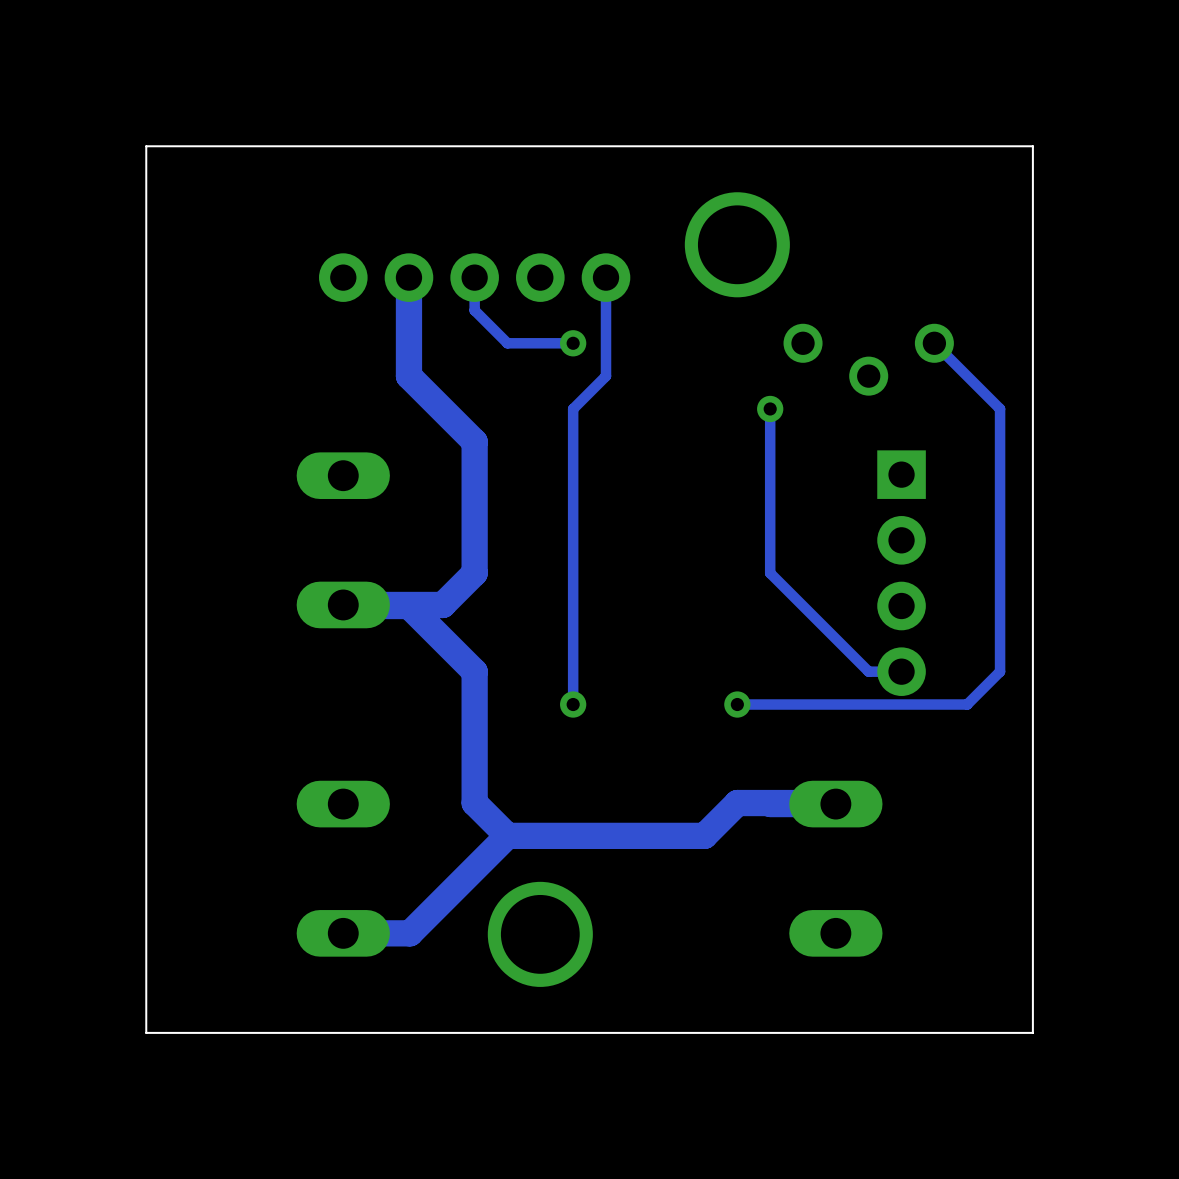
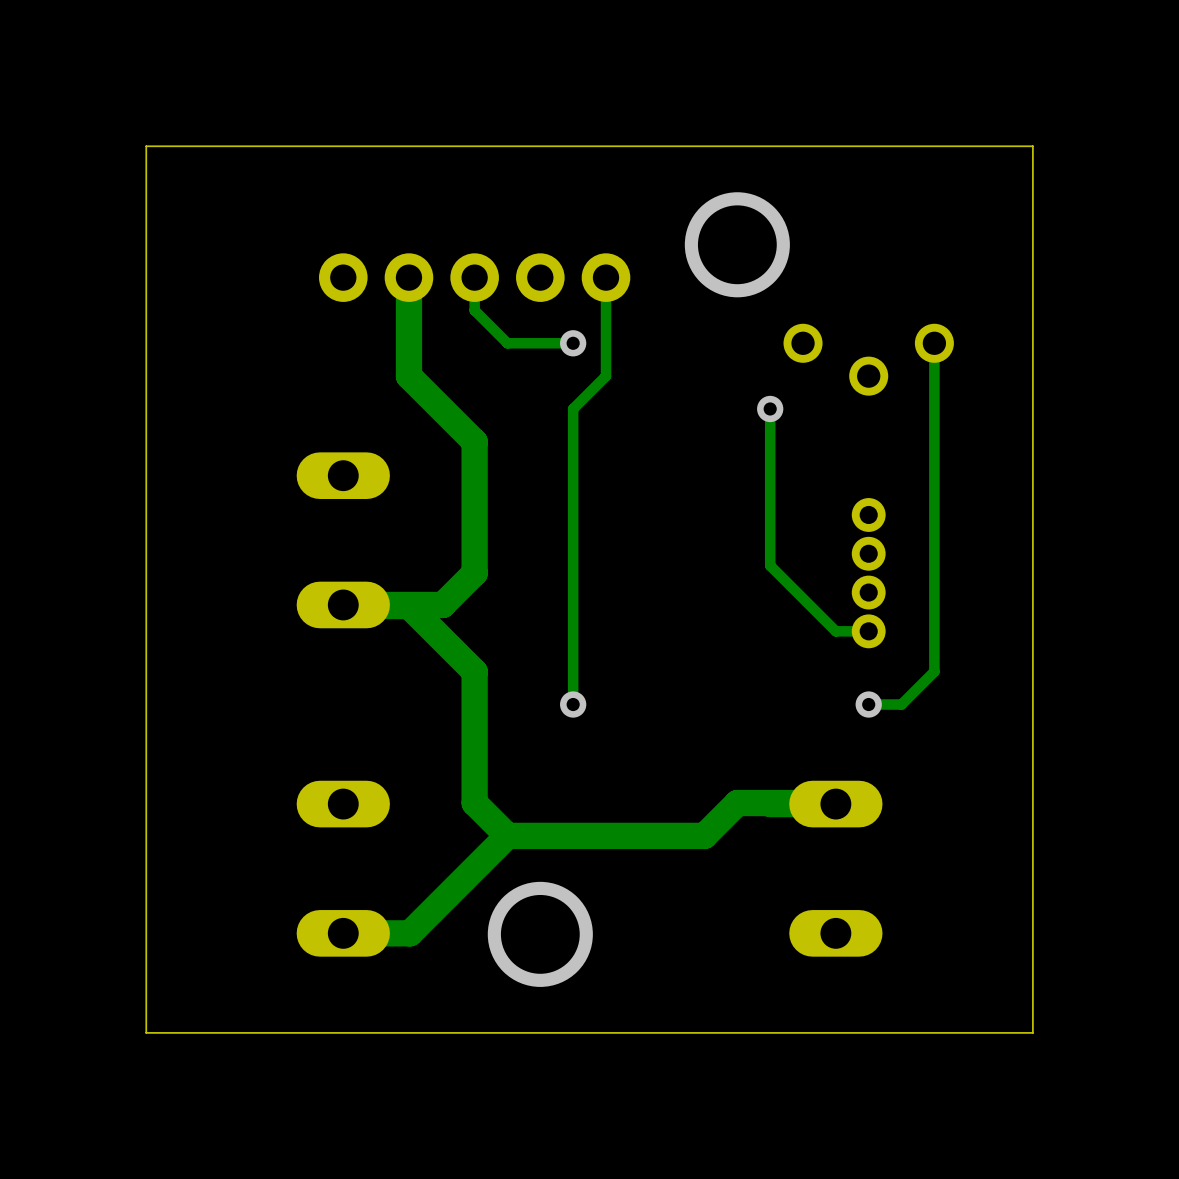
track: (934, 343) (1000, 408) (1000, 671) (967, 704) (901, 704) -> (934, 343) (934, 671) (901, 704)
track: (770, 565) (770, 573) (868, 671) (901, 671) -> (770, 565) (835, 631) (868, 631)
part: none -> (868, 573)
part: (901, 573) -> none
via position: (737, 704) -> (868, 704)
track: (868, 704) (737, 704) -> none

